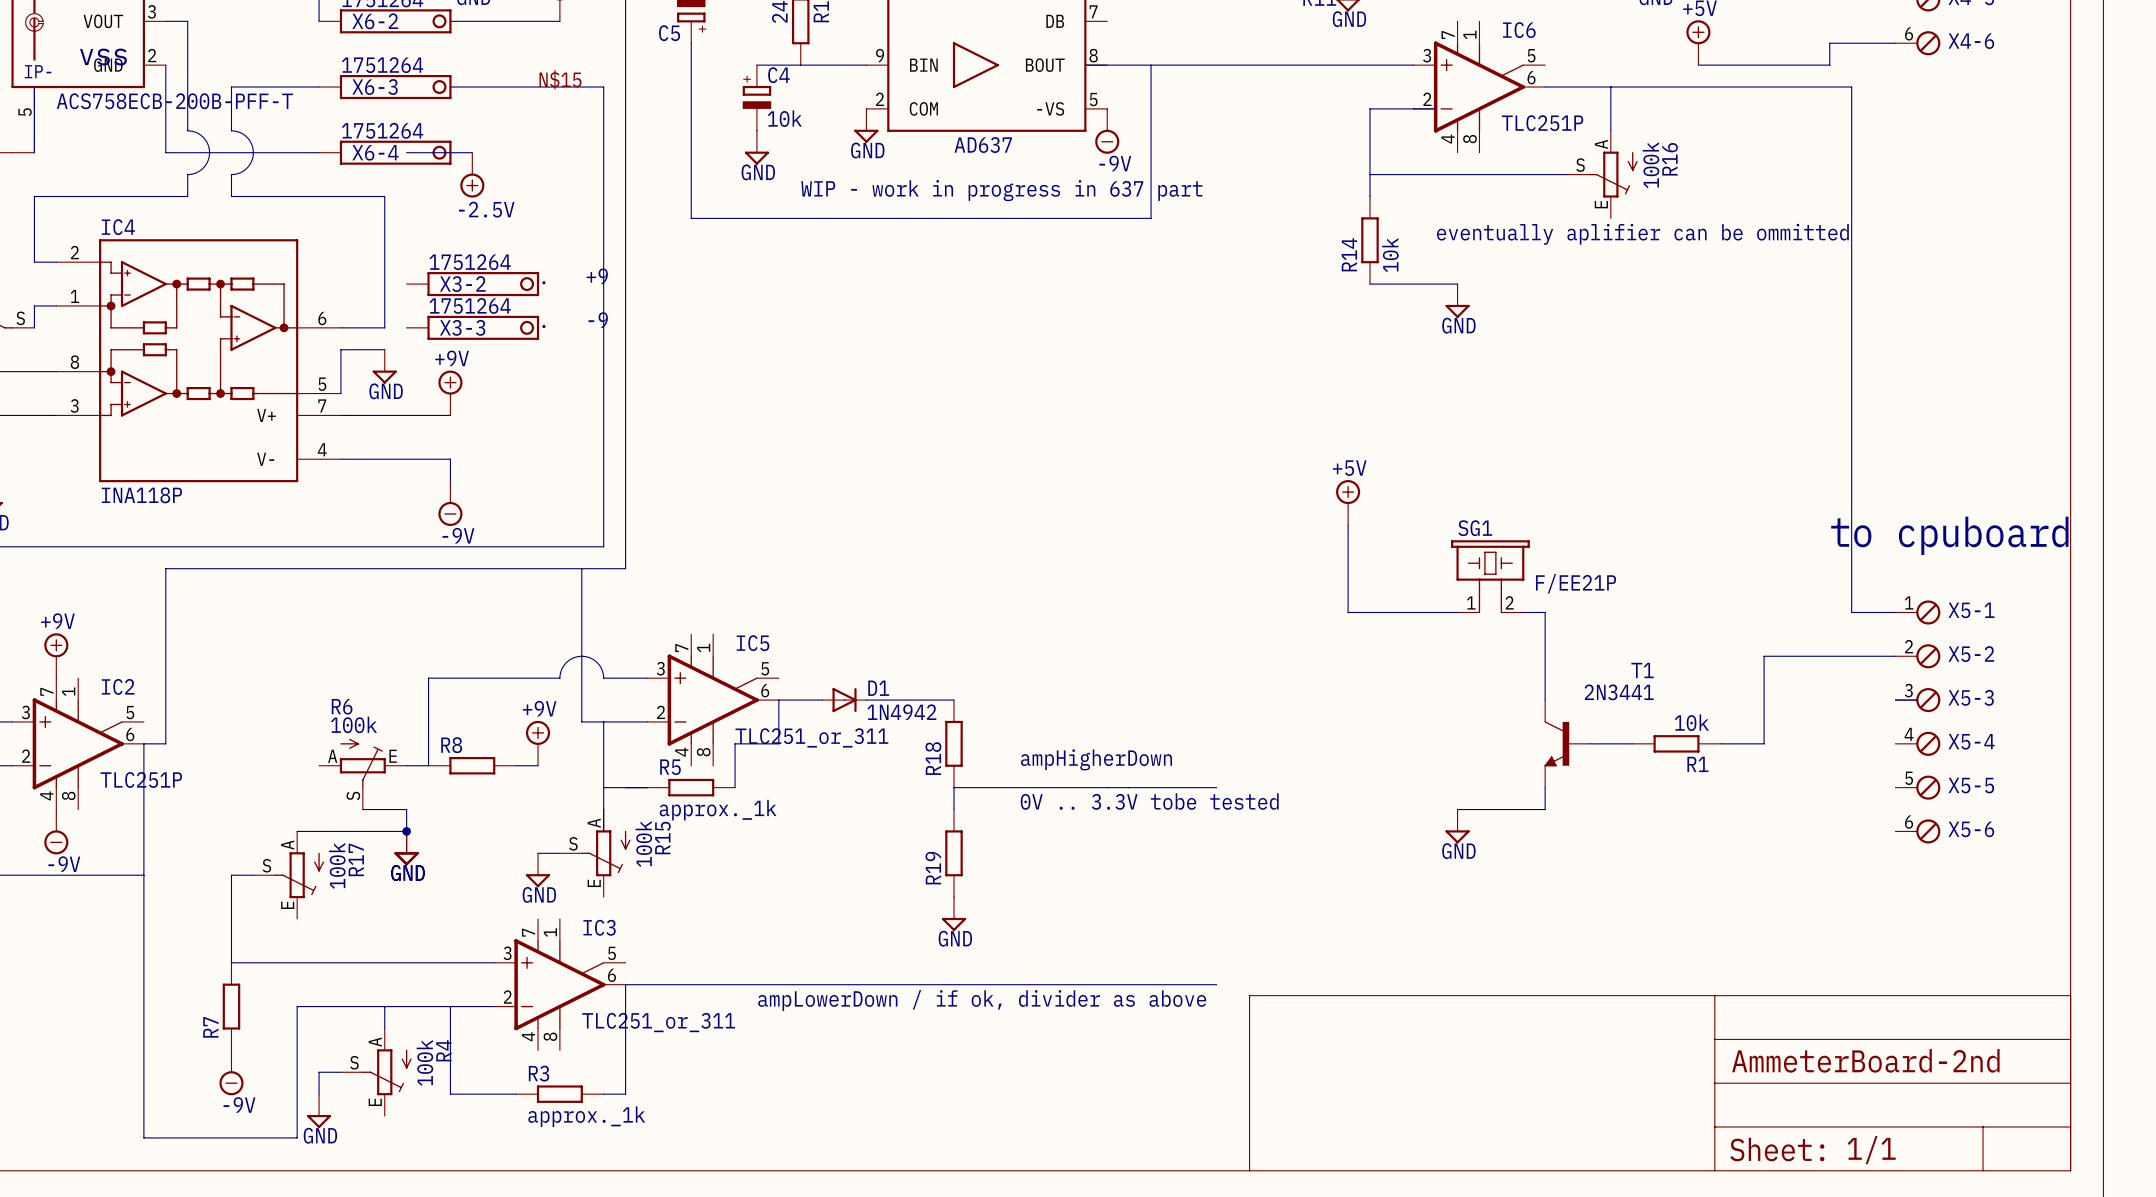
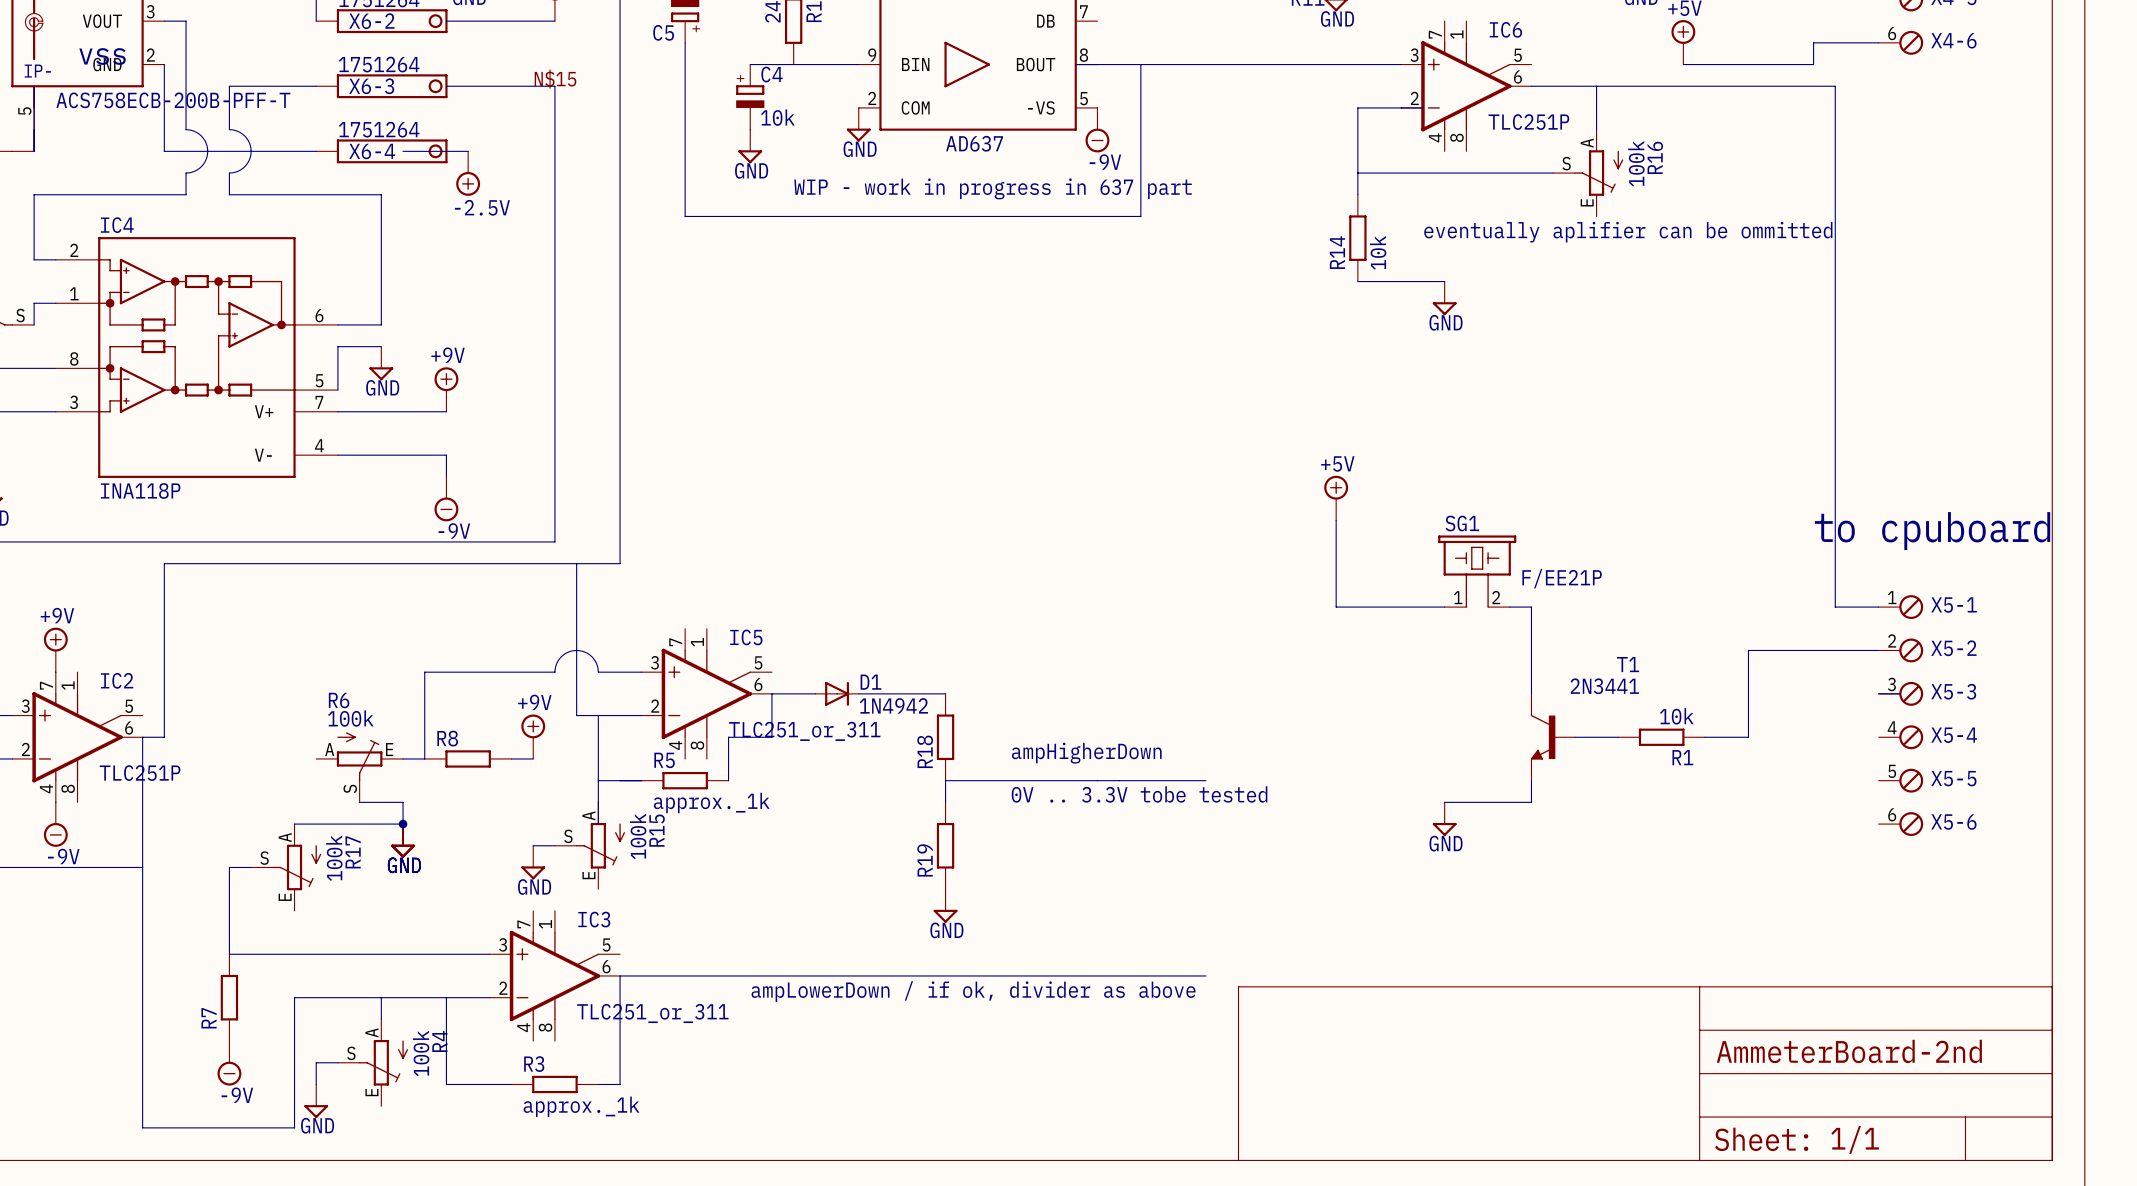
wire: (559, 87) (603, 87) (603, 546) (559, 546) -> (554, 86) (554, 541)
text: . +9 (575, 276) -> none
X3-2: 1751264 (472, 284) -> none
text: . -9 (575, 320) -> none
X3-3: 1751264 (472, 327) -> none

